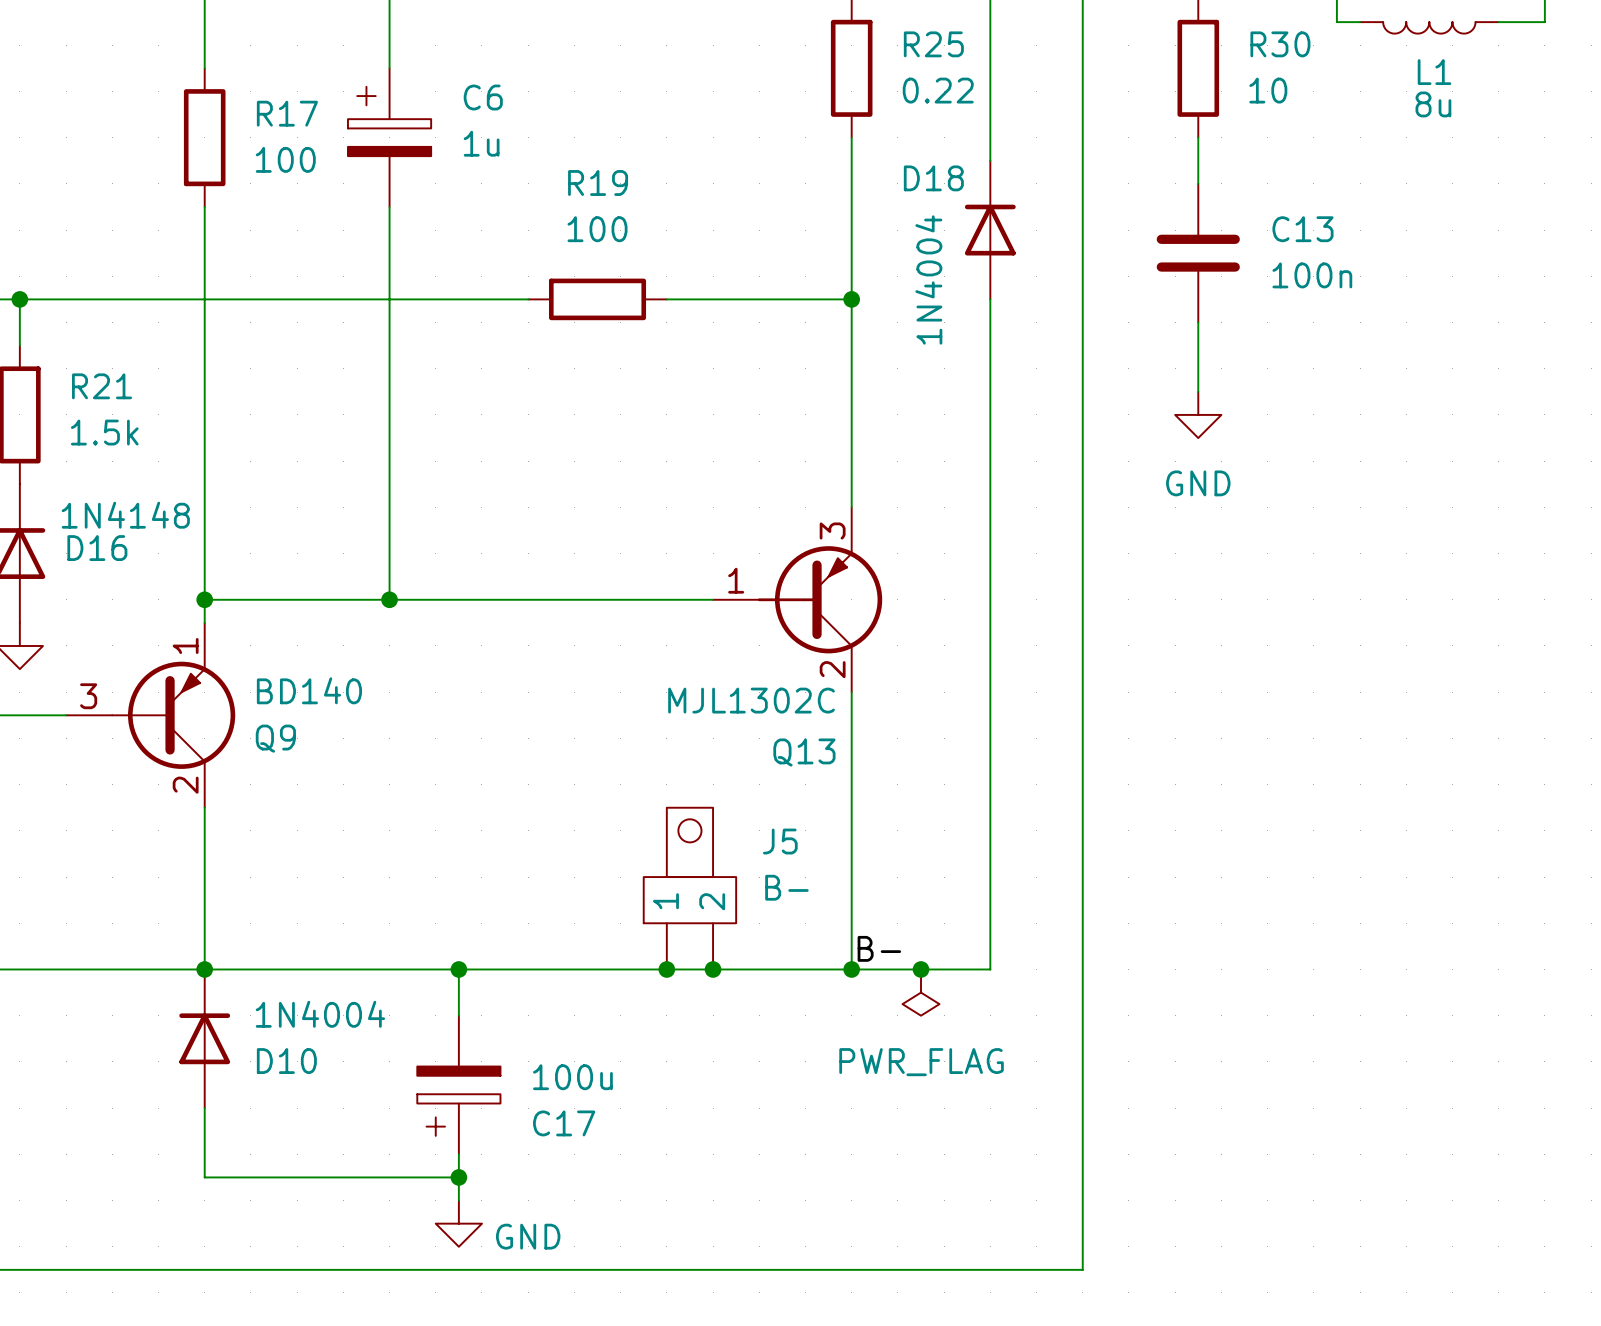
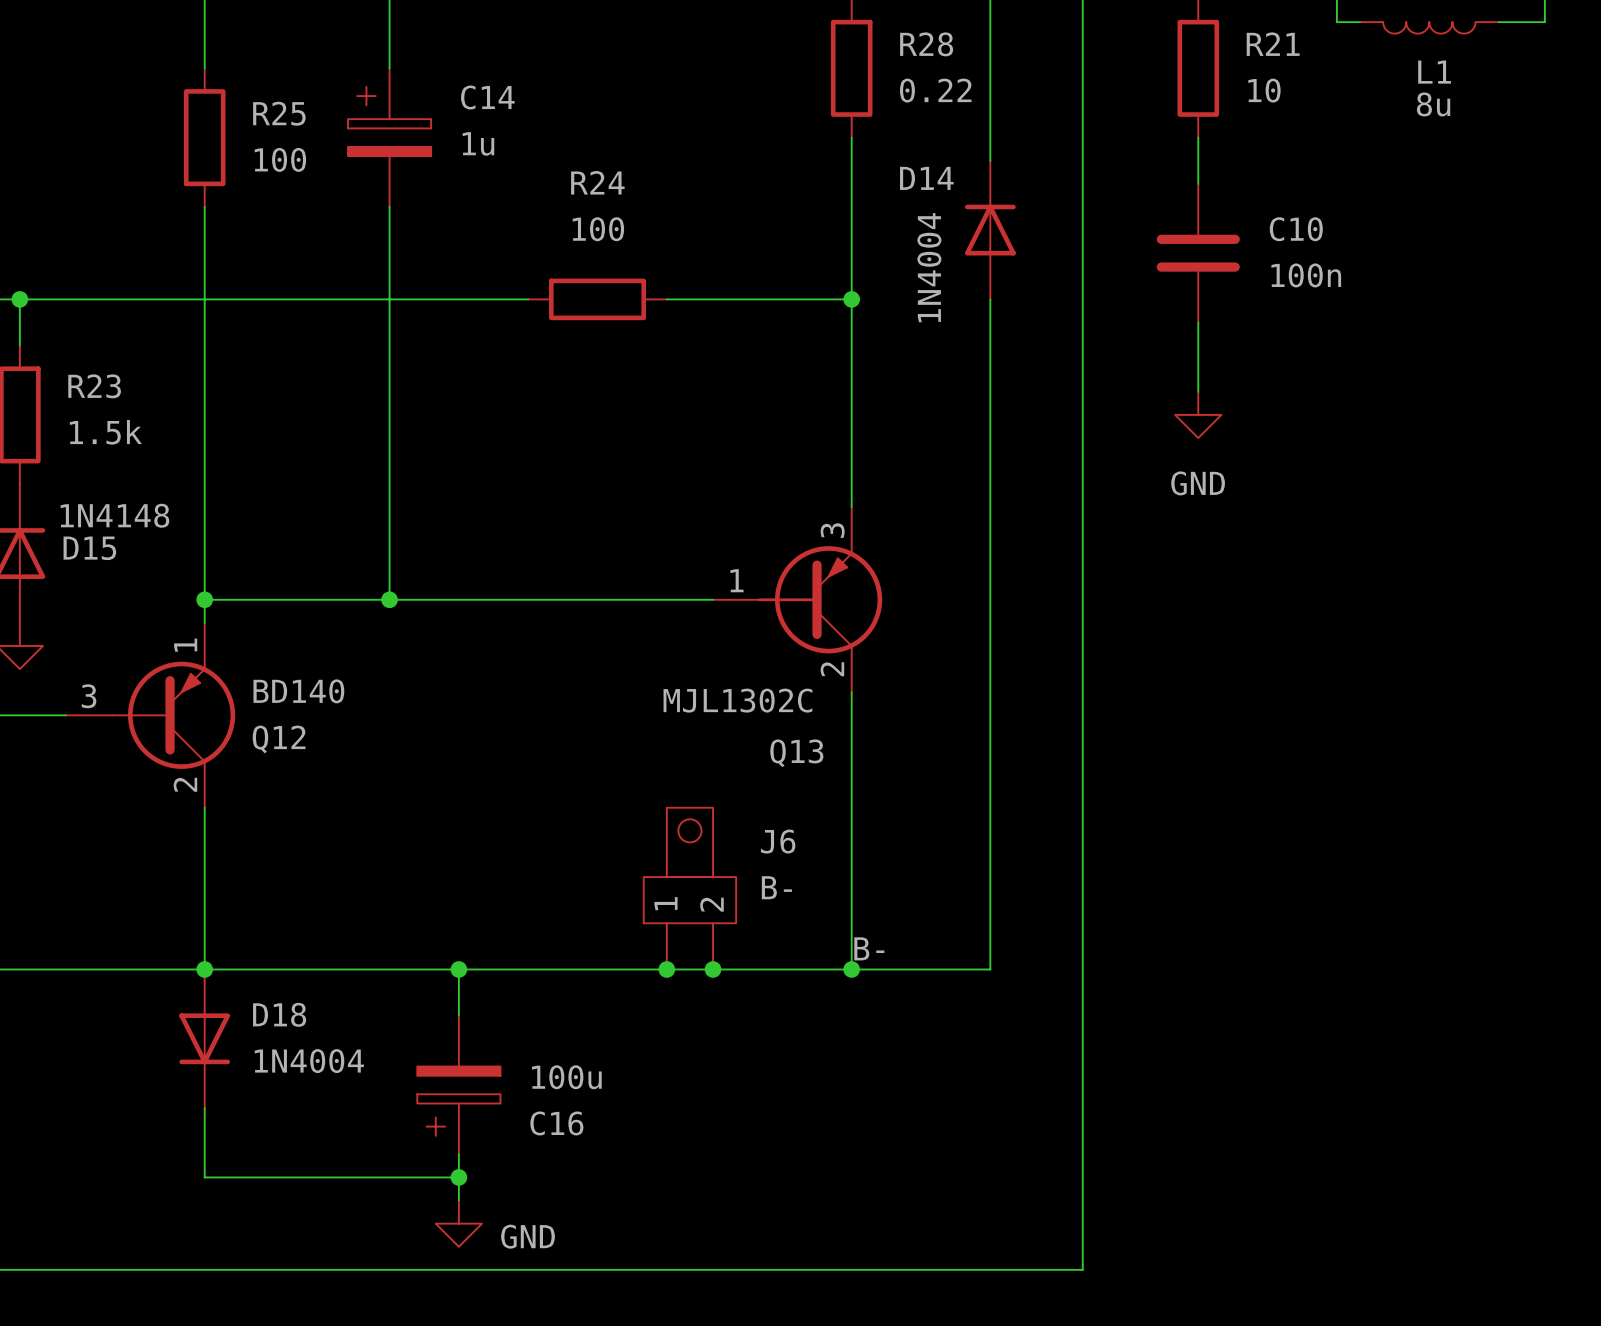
R25 name: R25 (933, 44) -> R28 (926, 44)
R30 name: R30 (1280, 44) -> R21 (1273, 44)
C6 name: C6 (483, 97) -> C14 (487, 97)
R17 name: R17 (287, 113) -> R25 (279, 113)
D18 name: D18 (933, 178) -> D14 (926, 178)
R19 name: R19 (598, 183) -> R24 (597, 182)
C13 name: C13 (1302, 229) -> C10 (1296, 229)
R21 name: R21 (102, 386) -> R23 (94, 386)
D16 name: D16 (97, 548) -> D15 (89, 548)
Q9 name: Q9 (275, 738) -> Q12 (279, 739)
J5 name: J5 (780, 841) -> J6 (778, 841)
junction: (921, 969) -> none
power symbol: PWR_FLAG (921, 992) -> none
D10: 1N4004 (204, 1038) -> none
D18: none -> 1N4004 (204, 1038)
C17 name: C17 (564, 1123) -> C16 (556, 1123)

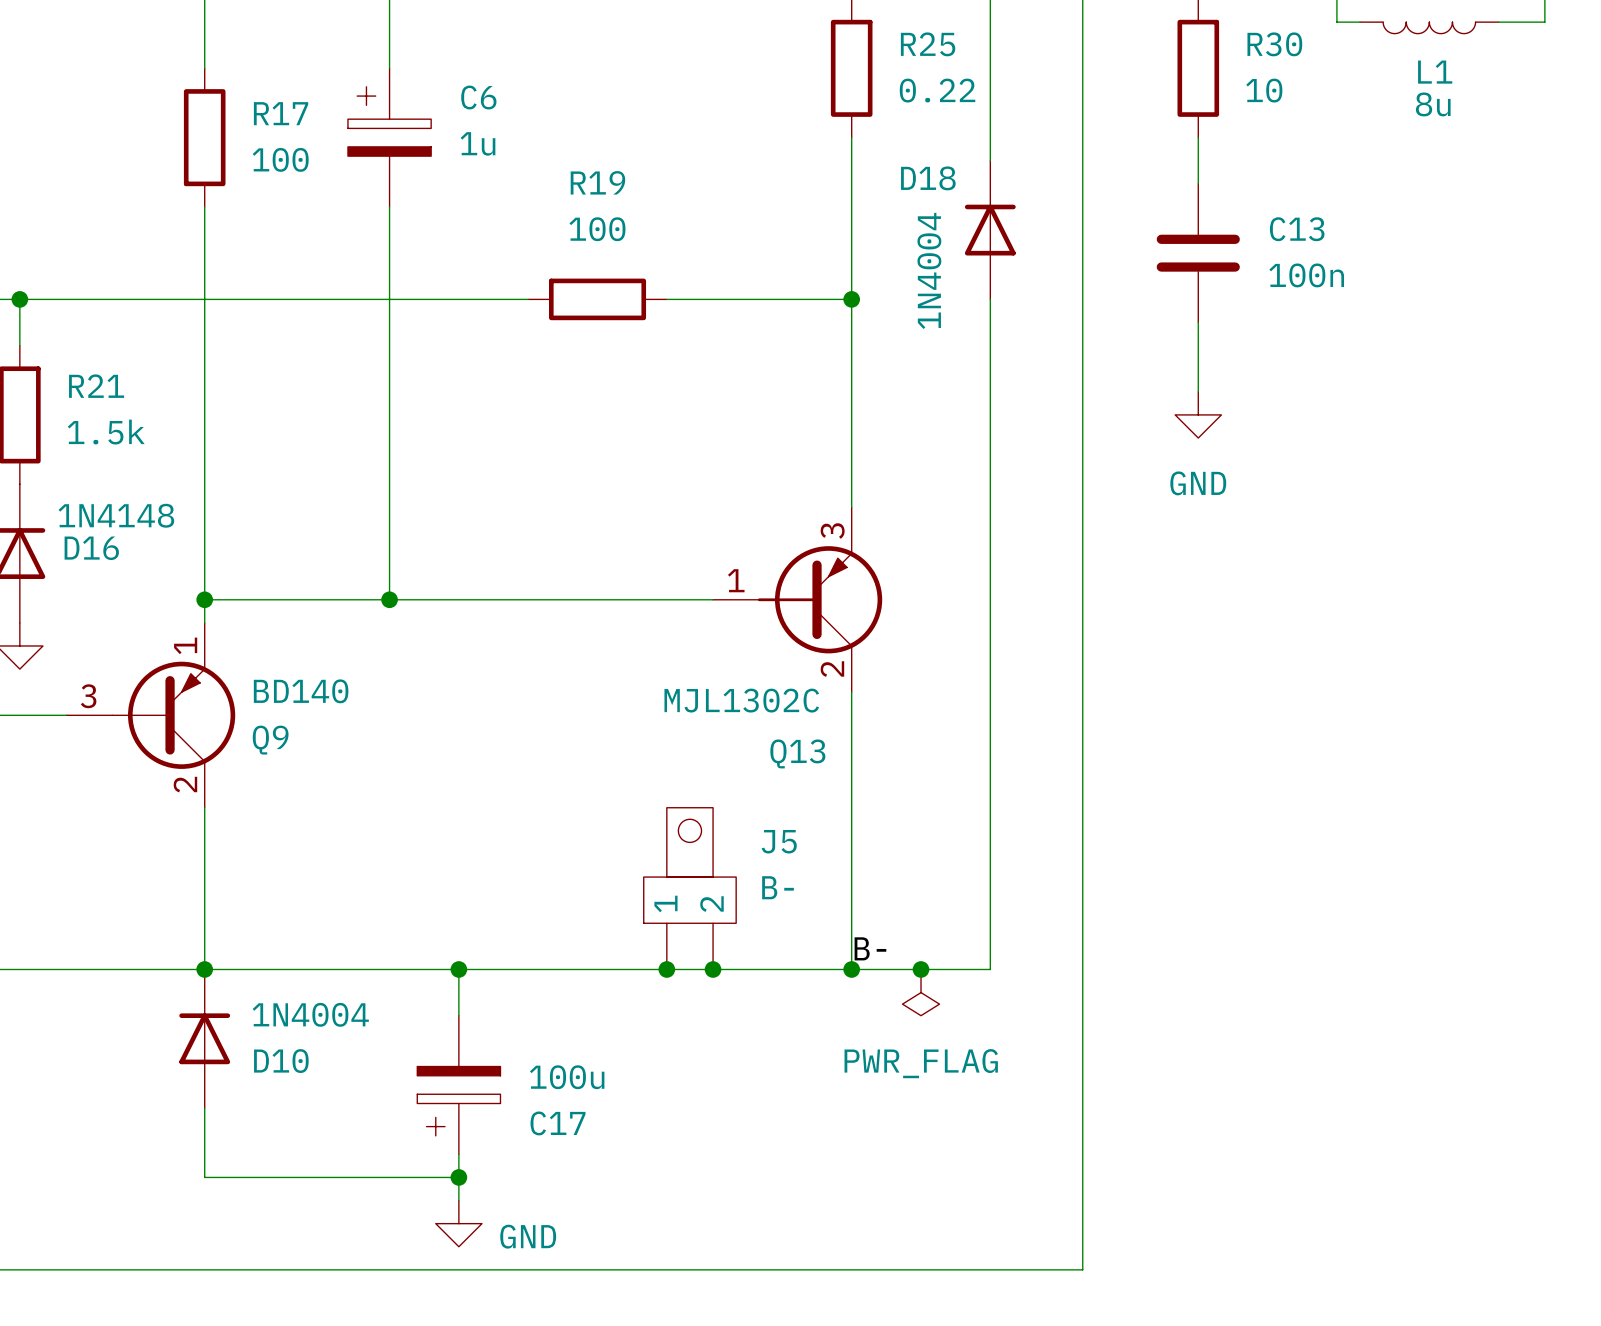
R28 name: R28 (926, 44) -> R25 (928, 44)
R21 name: R21 (1273, 44) -> R30 (1274, 44)
C14 name: C14 (487, 97) -> C6 (478, 97)
R25 name: R25 (279, 113) -> R17 (281, 113)
D14 name: D14 (926, 178) -> D18 (928, 178)
R24 name: R24 (597, 182) -> R19 (597, 182)
C10 name: C10 (1296, 229) -> C13 (1297, 229)
R23 name: R23 (94, 386) -> R21 (96, 386)
D15 name: D15 (89, 548) -> D16 (91, 548)
Q12 name: Q12 (279, 739) -> Q9 (270, 740)
J6 name: J6 (778, 841) -> J5 (779, 841)
junction: none -> (921, 969)
power symbol: none -> PWR_FLAG (921, 992)
D18: 1N4004 (204, 1038) -> none
D10: none -> 1N4004 (204, 1038)
C16 name: C16 (556, 1123) -> C17 (558, 1123)

